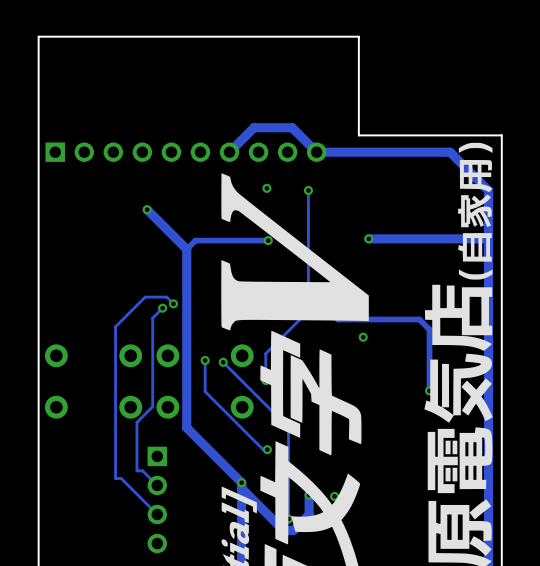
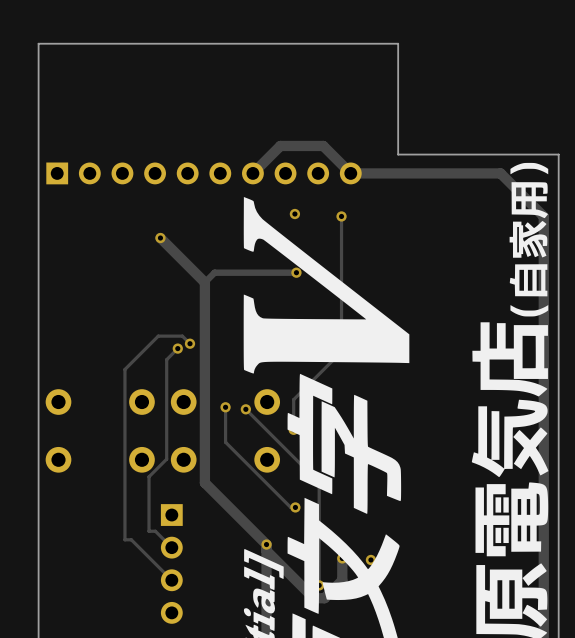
via: (368, 238) -> none
track: (488, 238) (368, 238) -> none
track: (330, 311) (338, 319) (419, 319) (429, 329) (429, 390) -> none
via: (363, 337) -> none
via: (429, 390) -> none

